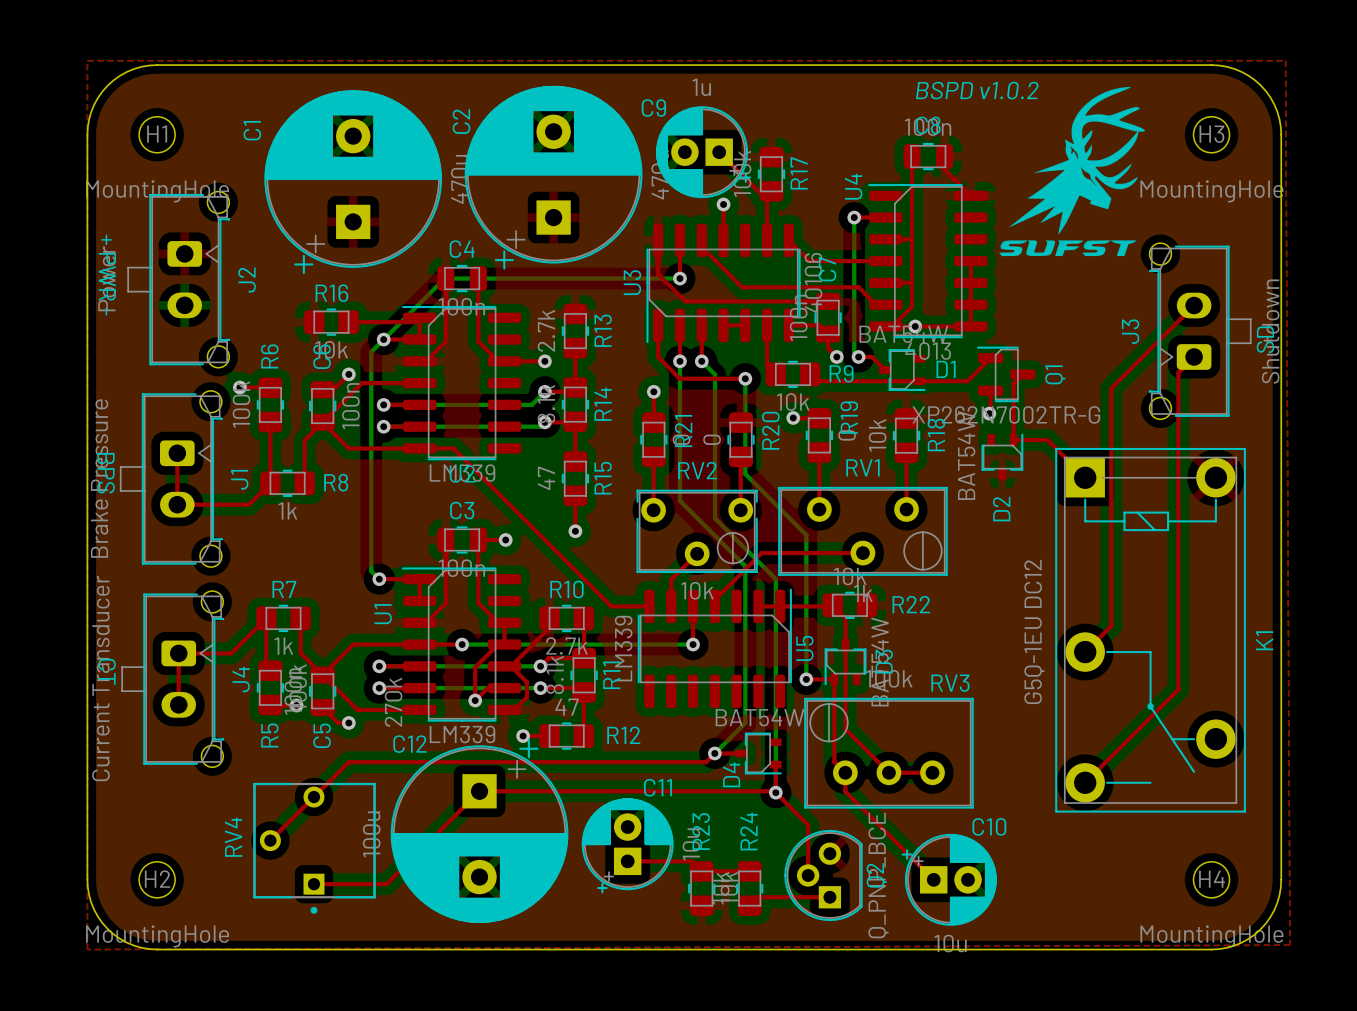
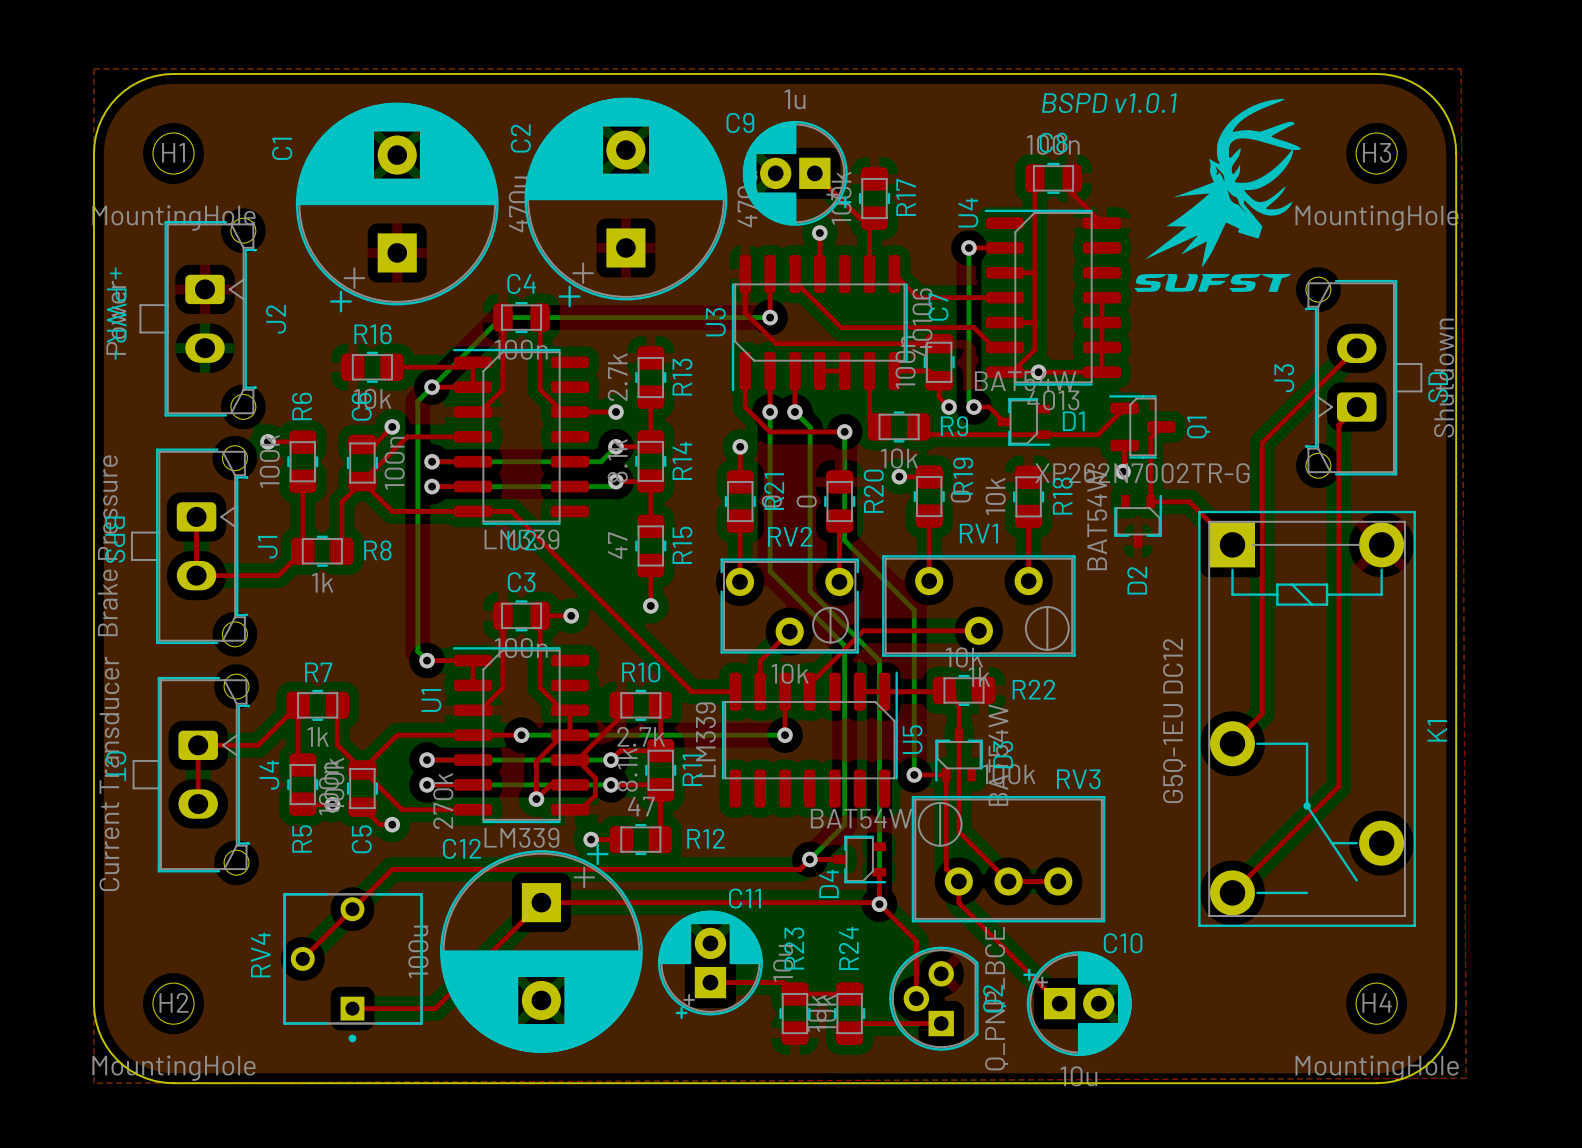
text: BSPD v1.0.2 (977, 90) -> BSPD v1.0.1 (1109, 103)

